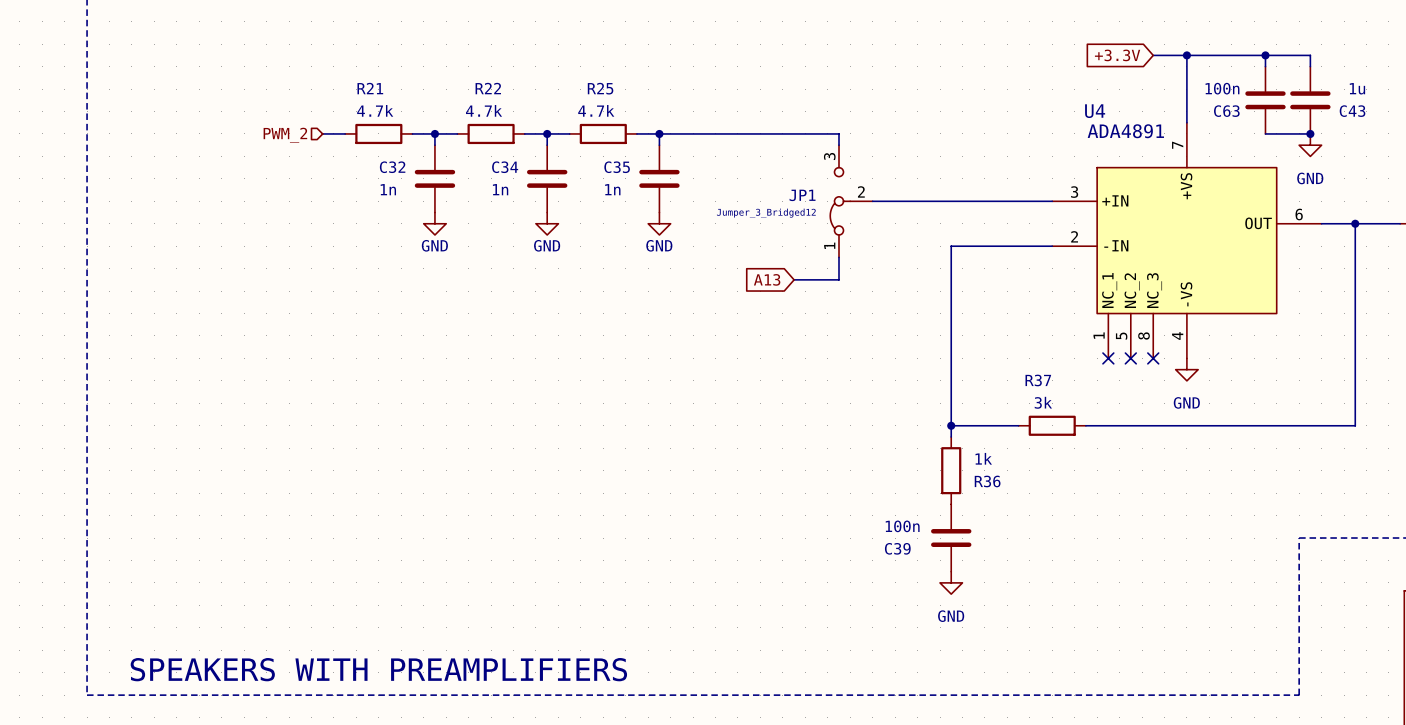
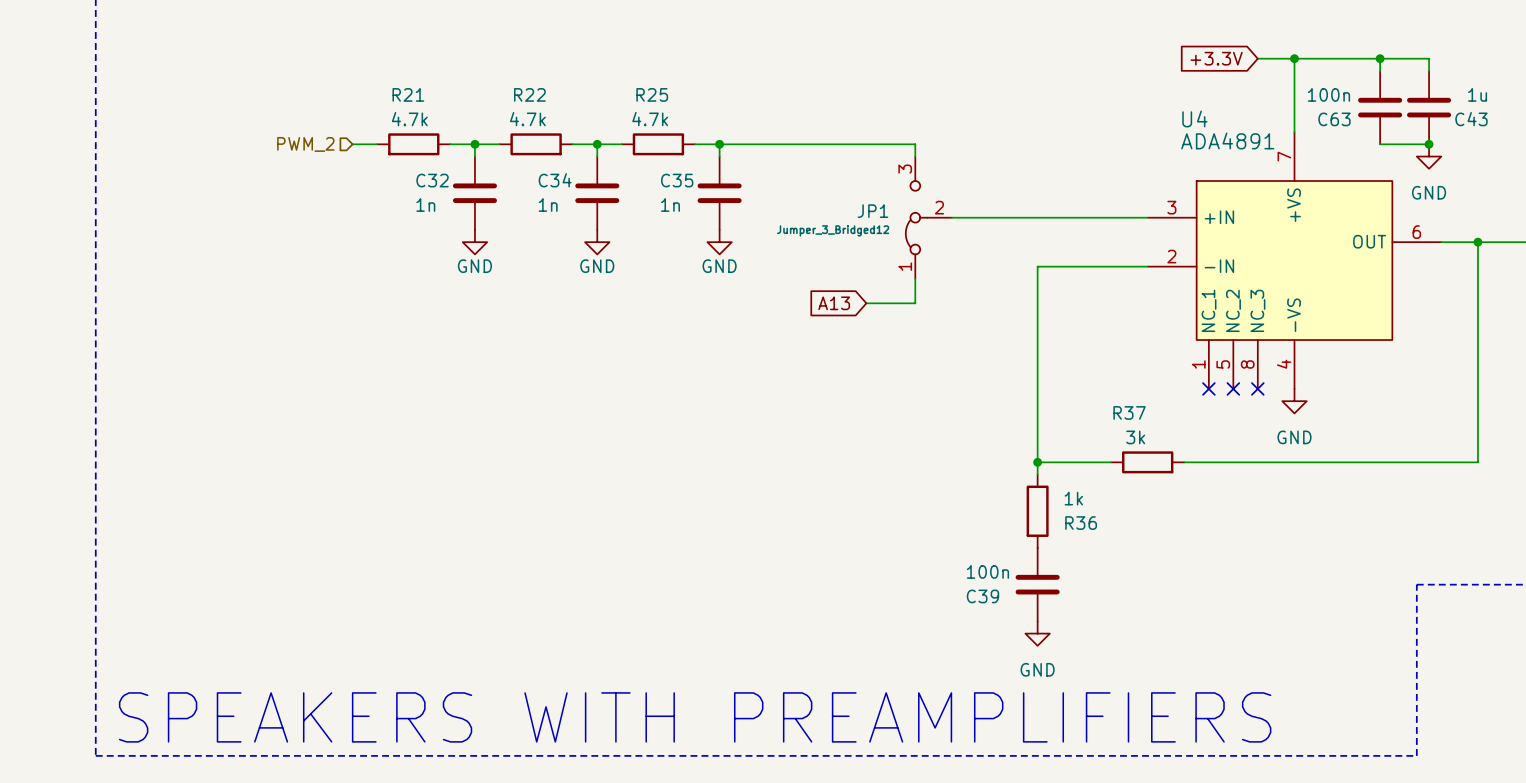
text: none -> SPEAKERS WITH PREAMPLIFIERS (695, 717)
text: SPEAKERS WITH PREAMPLIFIERS (378, 669) -> none

